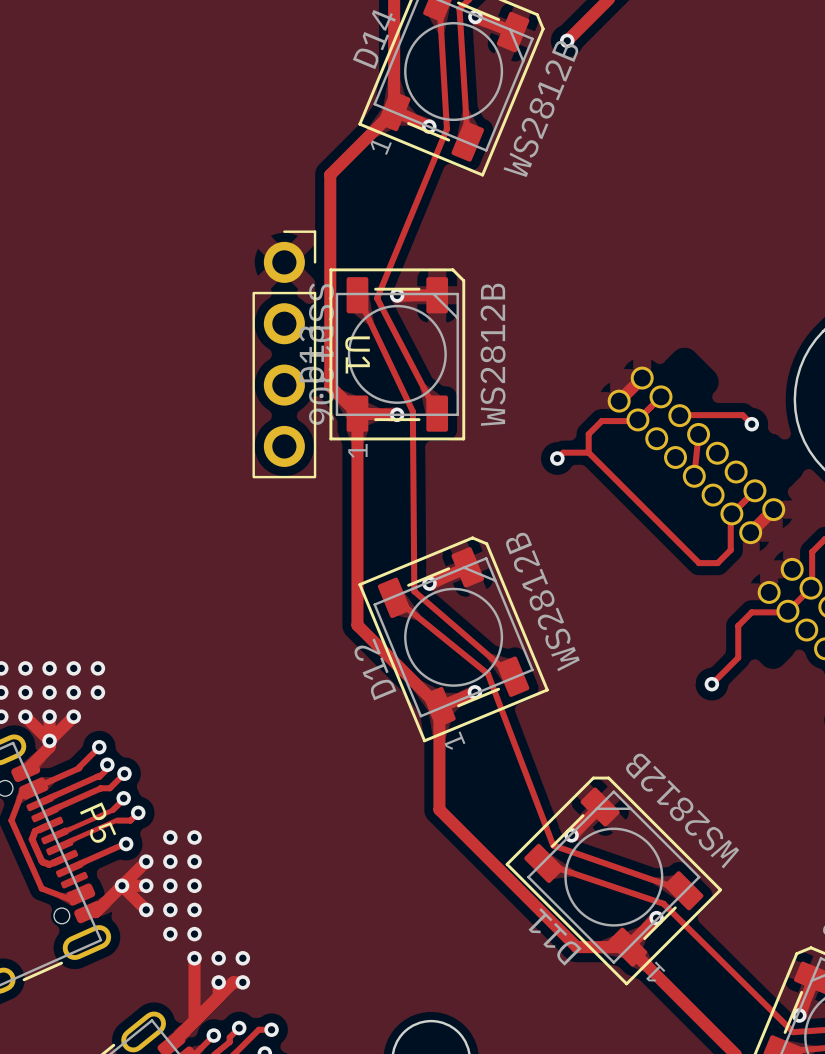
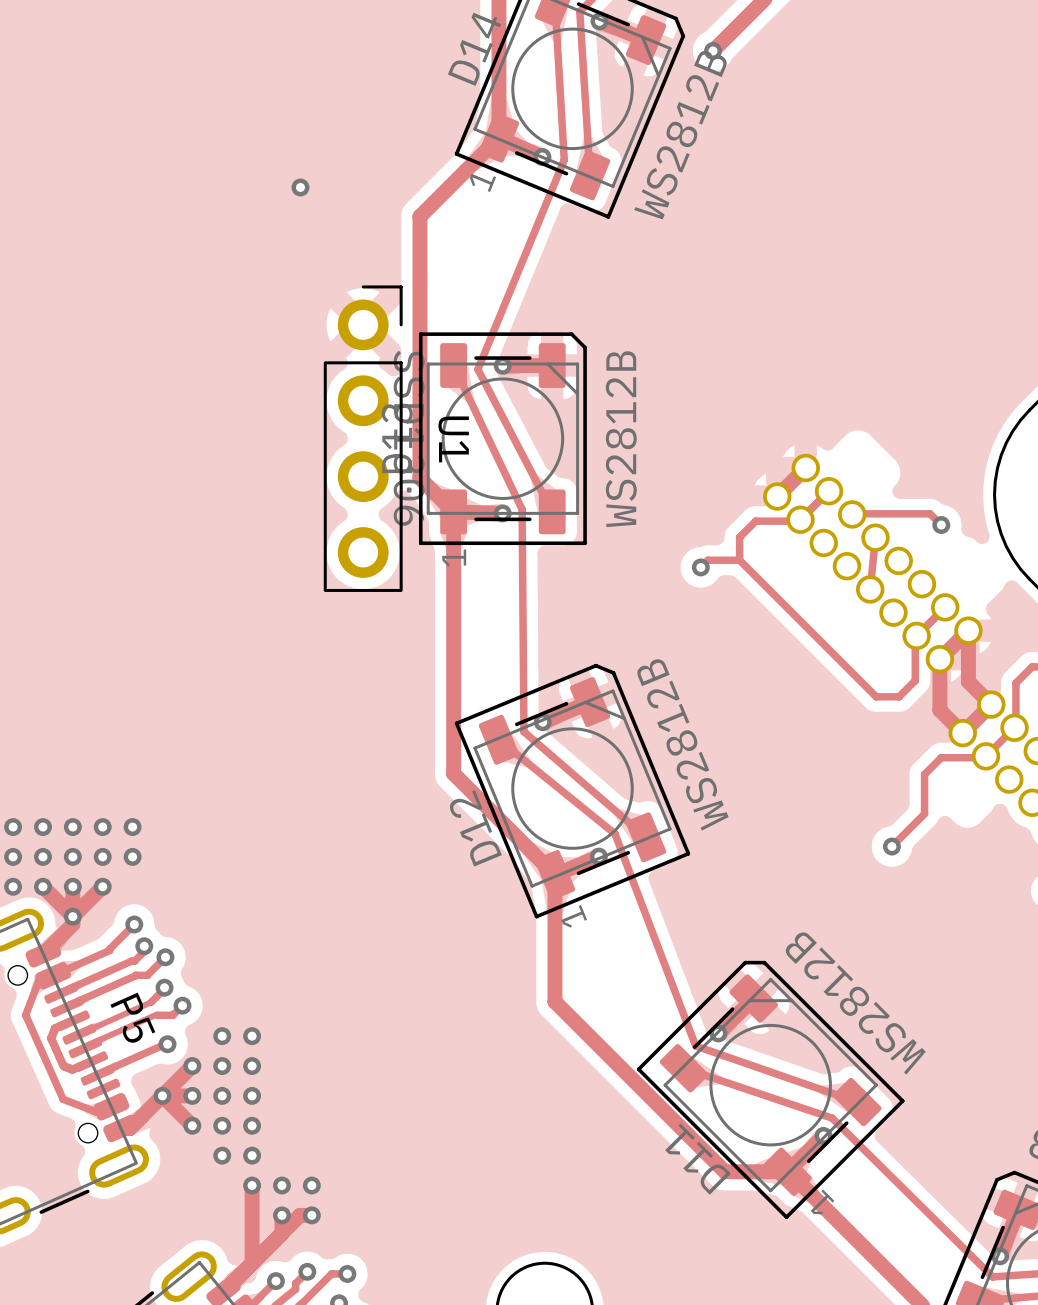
via: none -> (300, 187)
track: none -> (968, 630) (968, 681) (991, 704) (962, 733) (939, 710) (939, 659)

